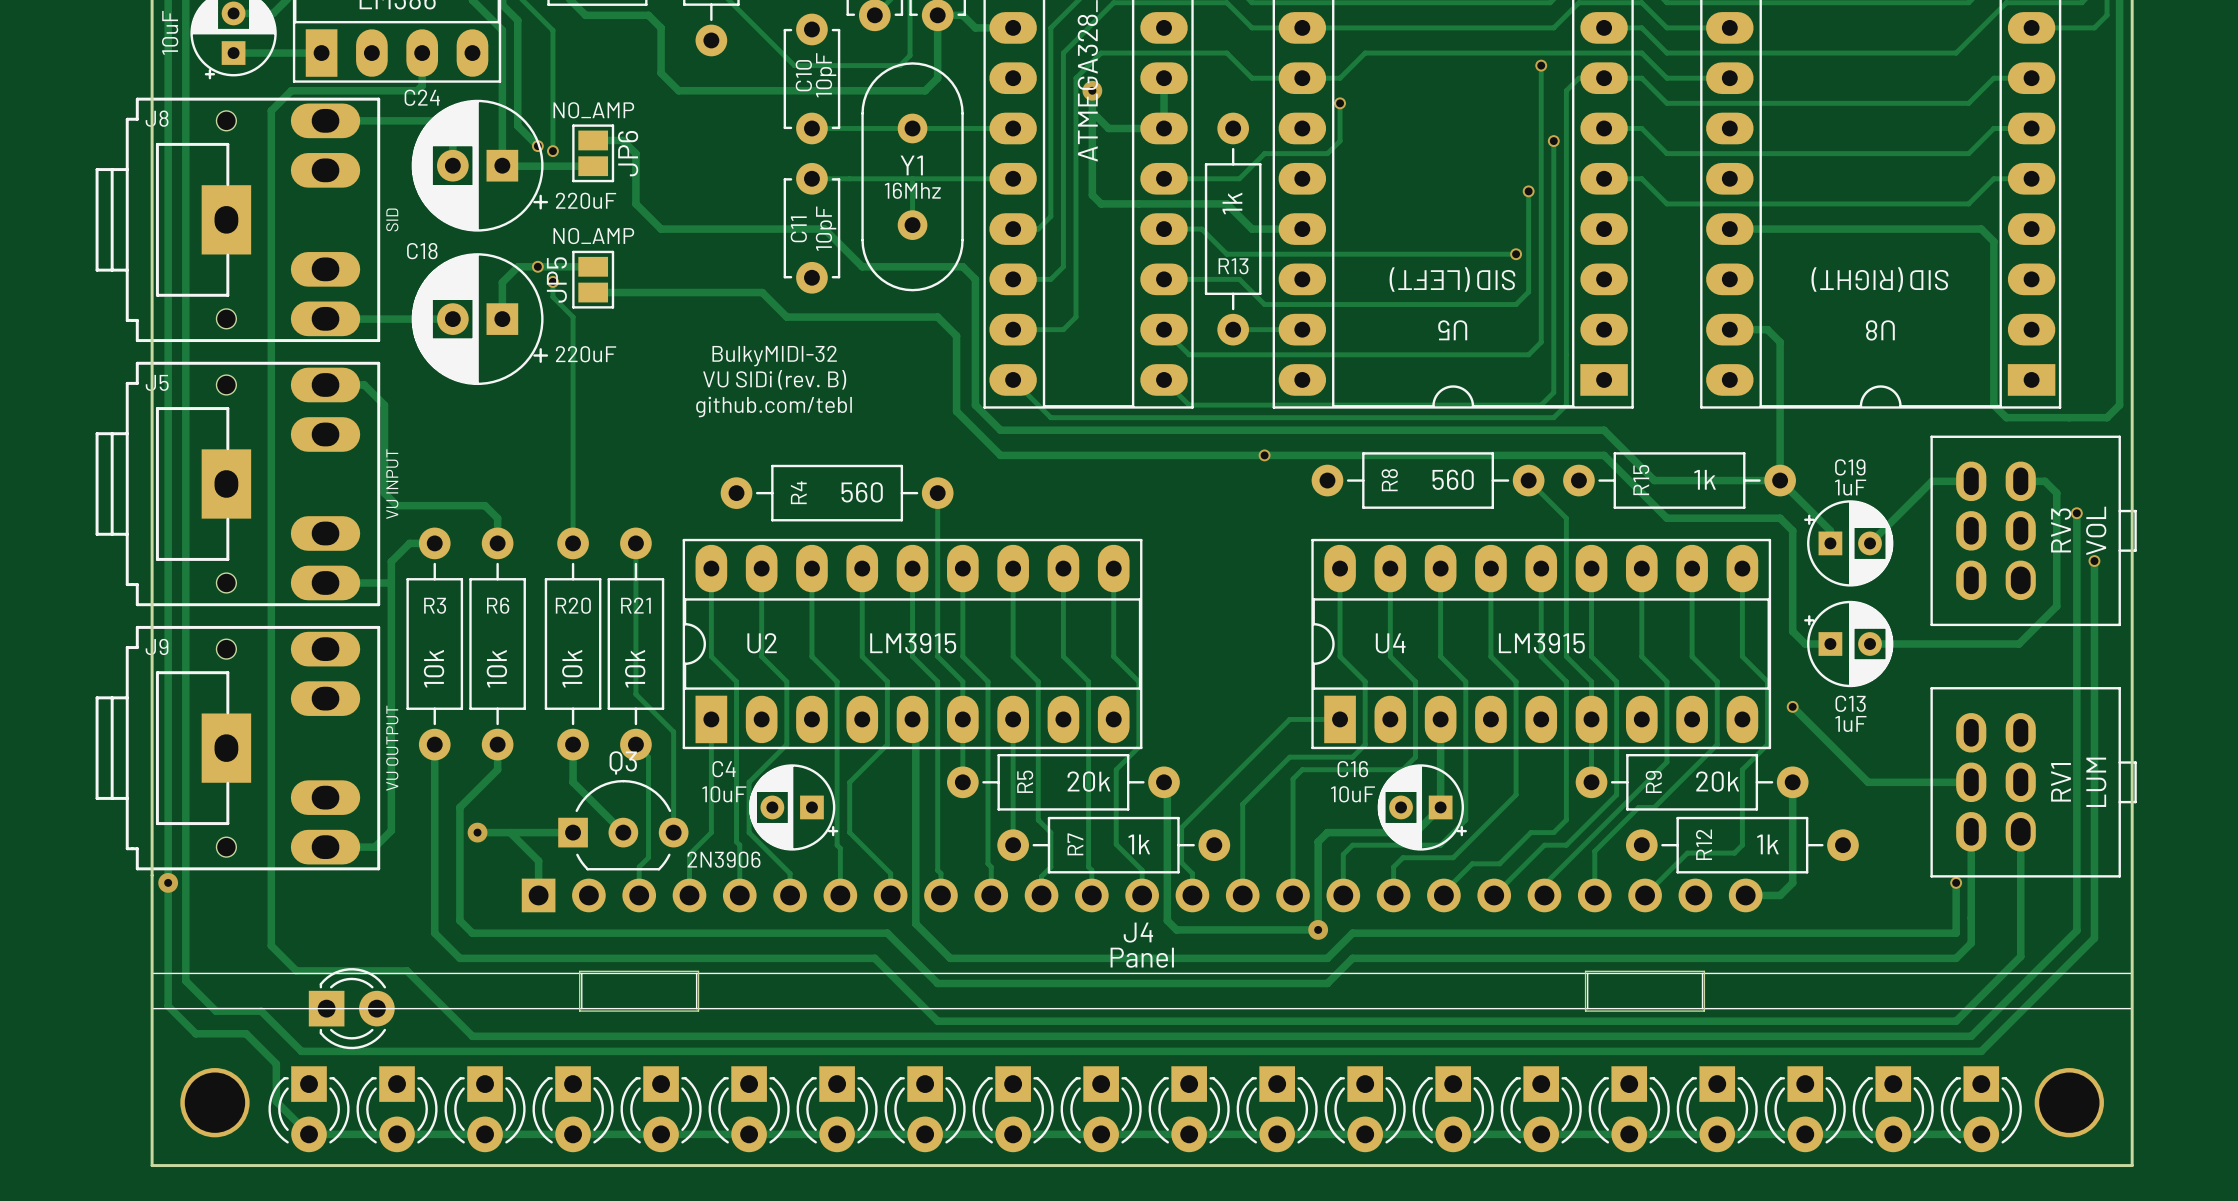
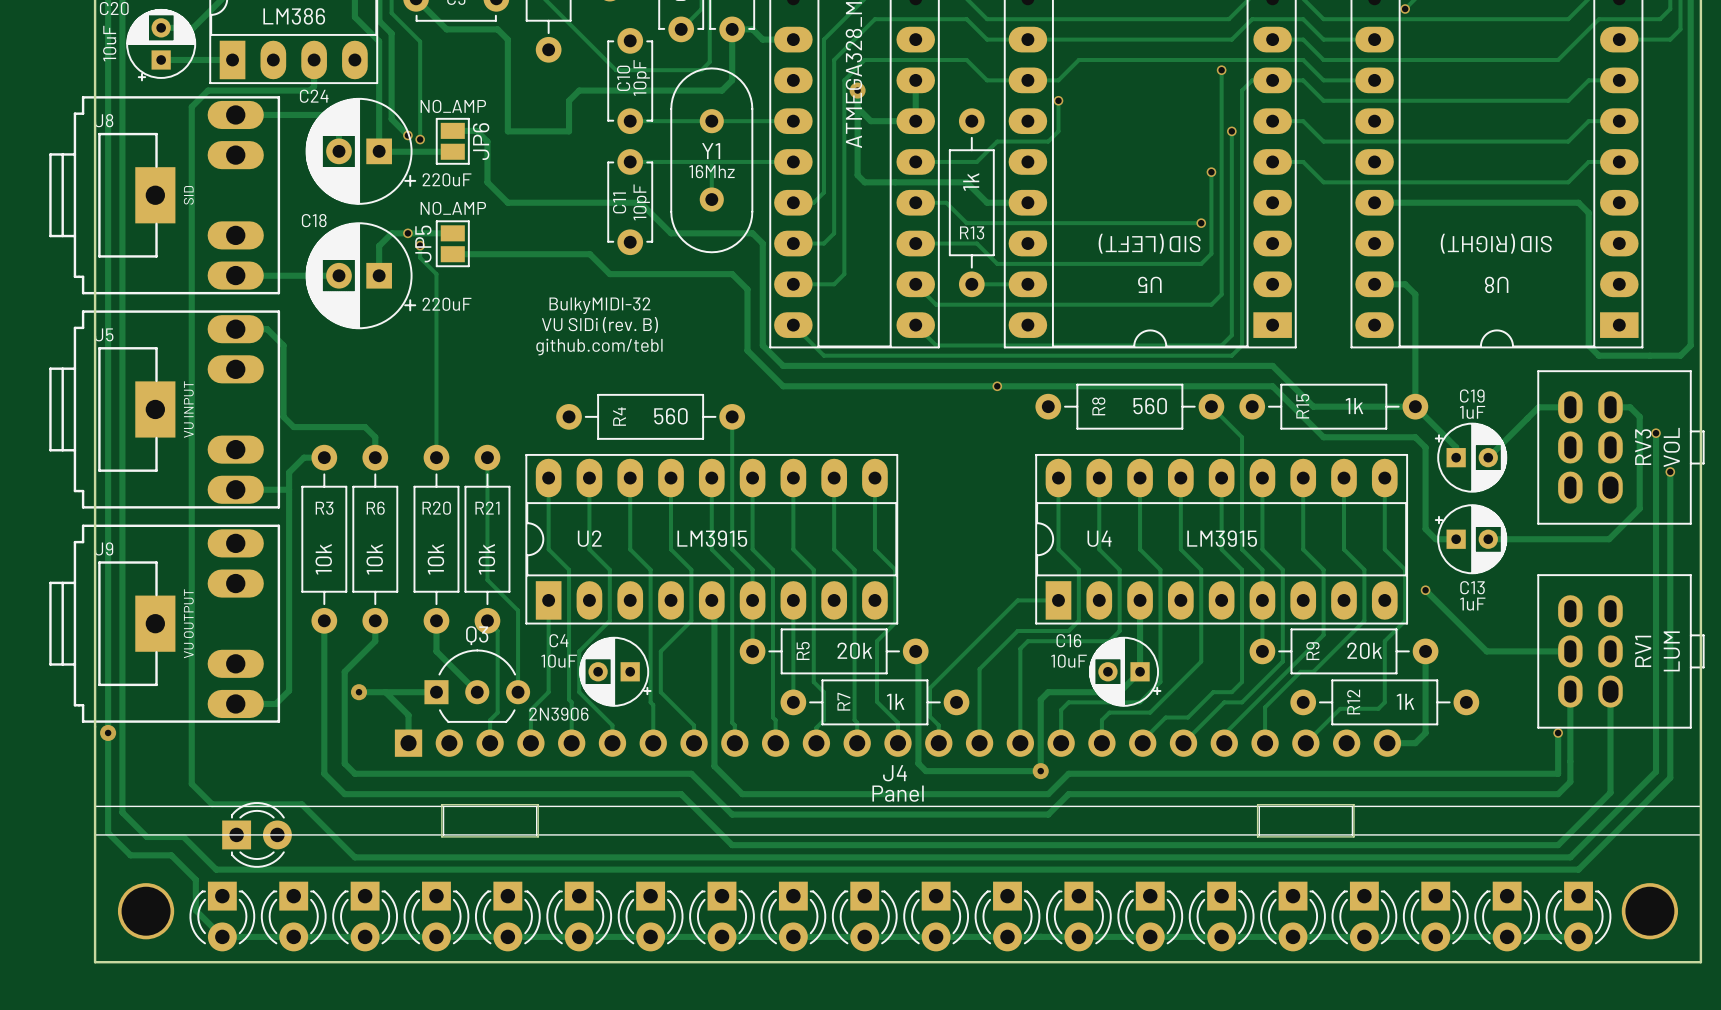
track: (661, 73) (678, 90) (749, 90) -> (507, 76) (507, 131) (569, 131) (569, 100) (579, 90)
J8 footprint: [95, 97, 381, 343] -> [49, 96, 281, 295]
J8 value position: SID (392, 219) -> SID (188, 195)
J5 footprint: [95, 361, 381, 607] -> [49, 310, 281, 509]
J5 value position: VU INPUT (392, 484) -> VU INPUT (188, 409)
J9 footprint: [95, 625, 381, 871] -> [49, 524, 281, 723]
J9 value position: VU OUTPUT (392, 748) -> VU OUTPUT (188, 623)

